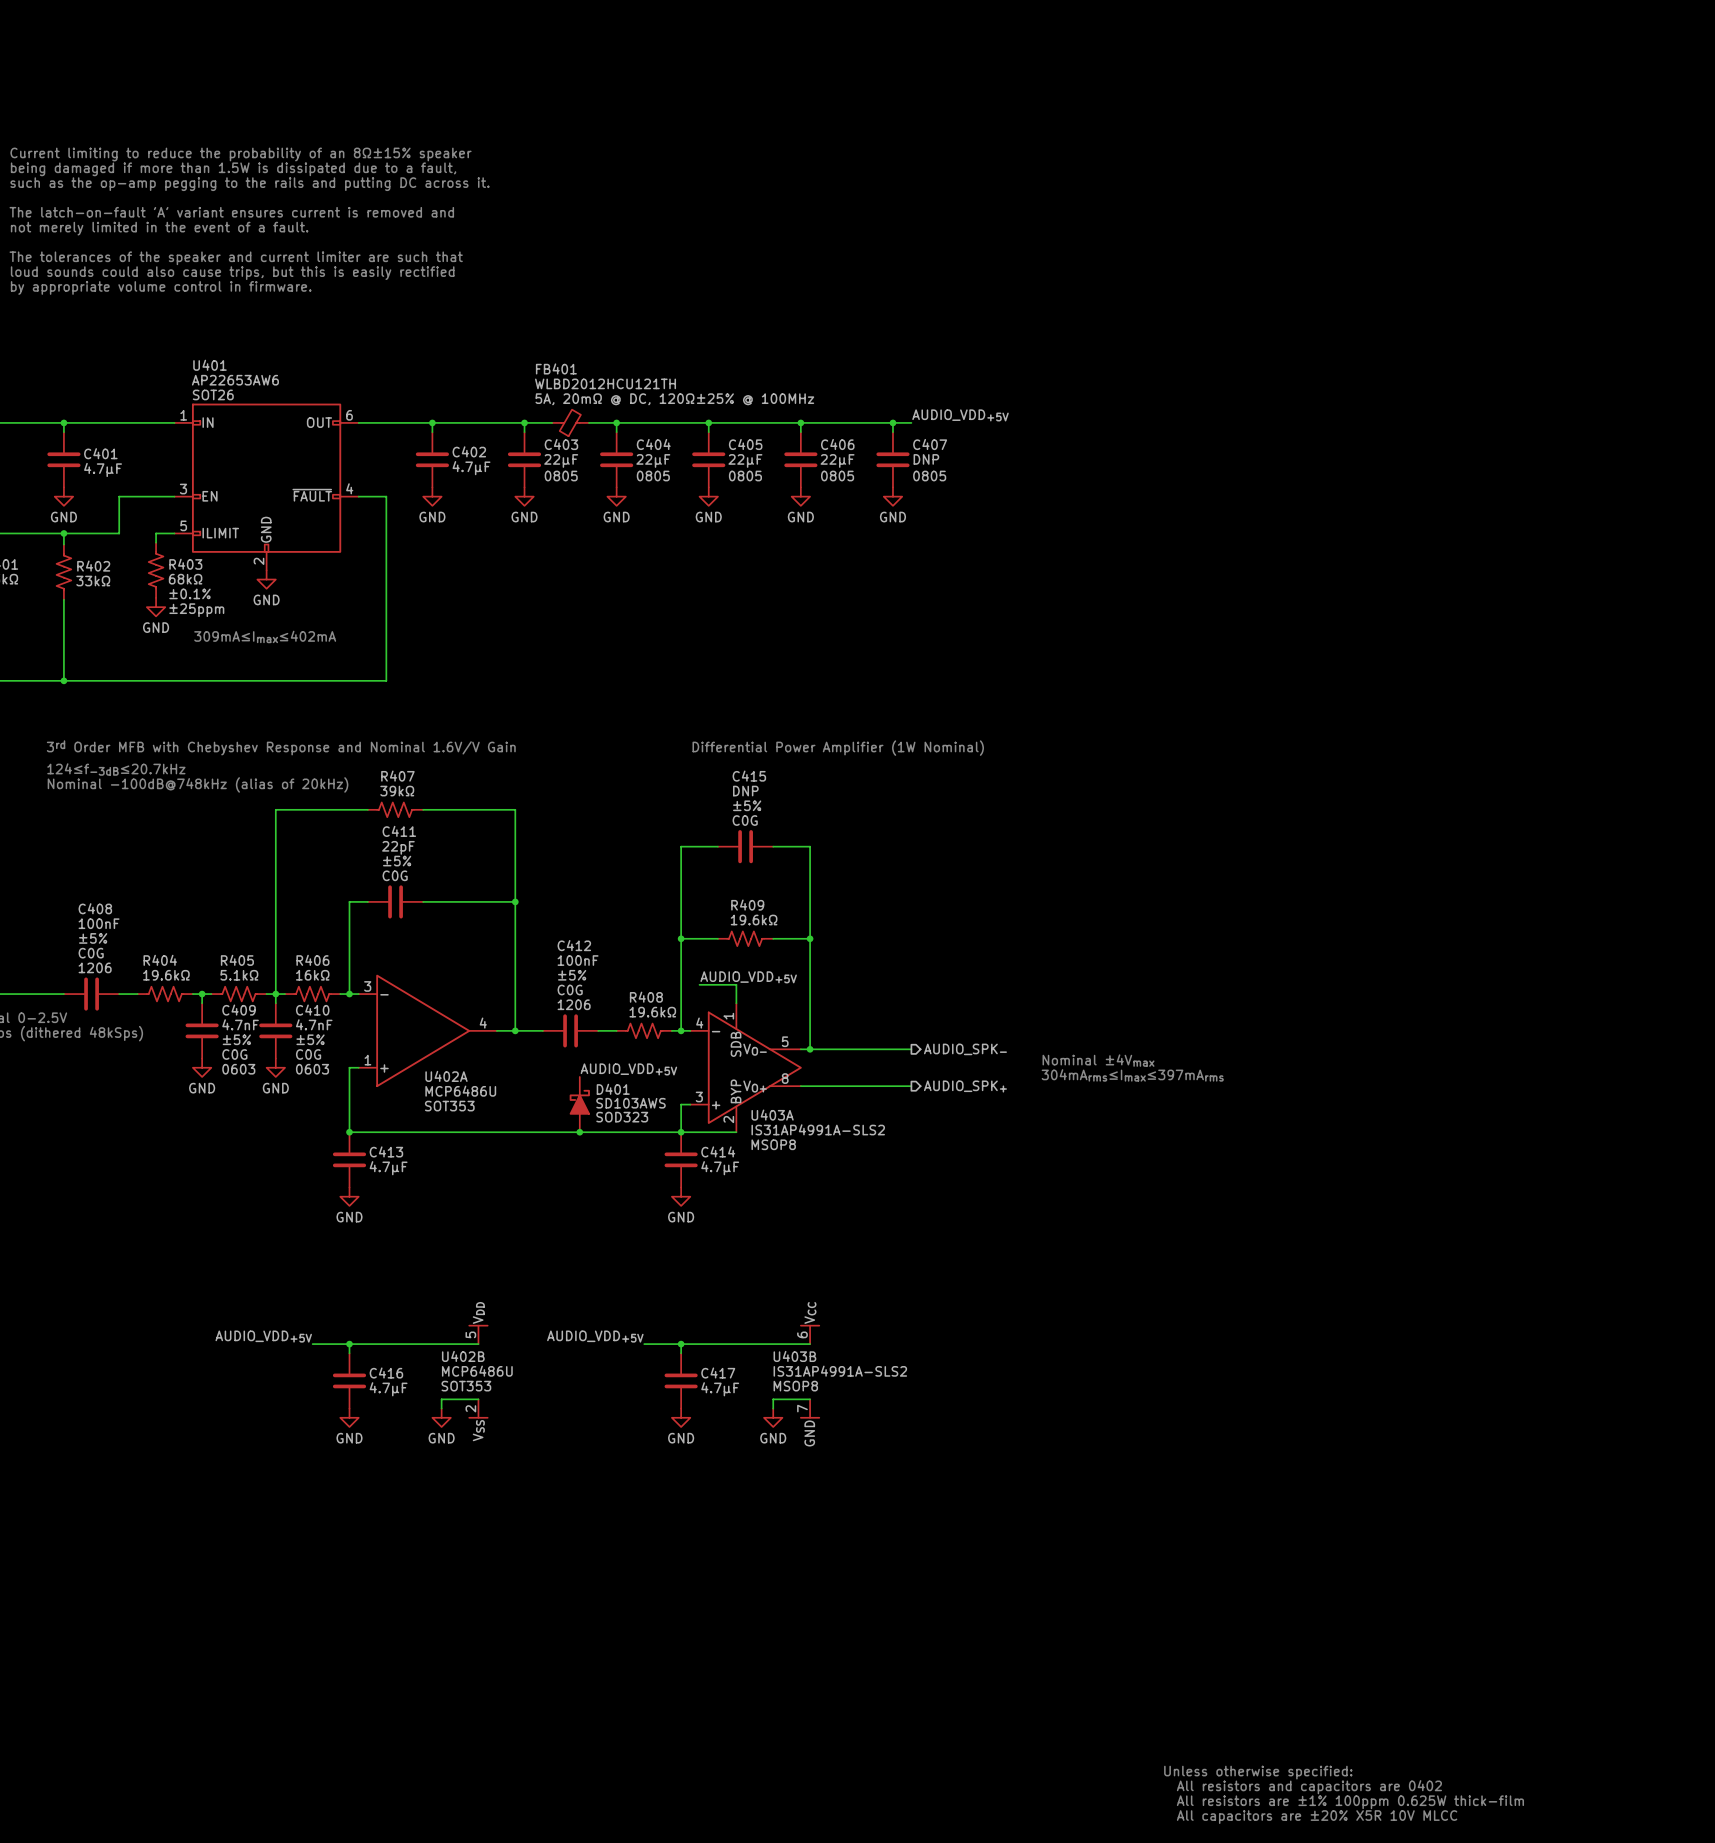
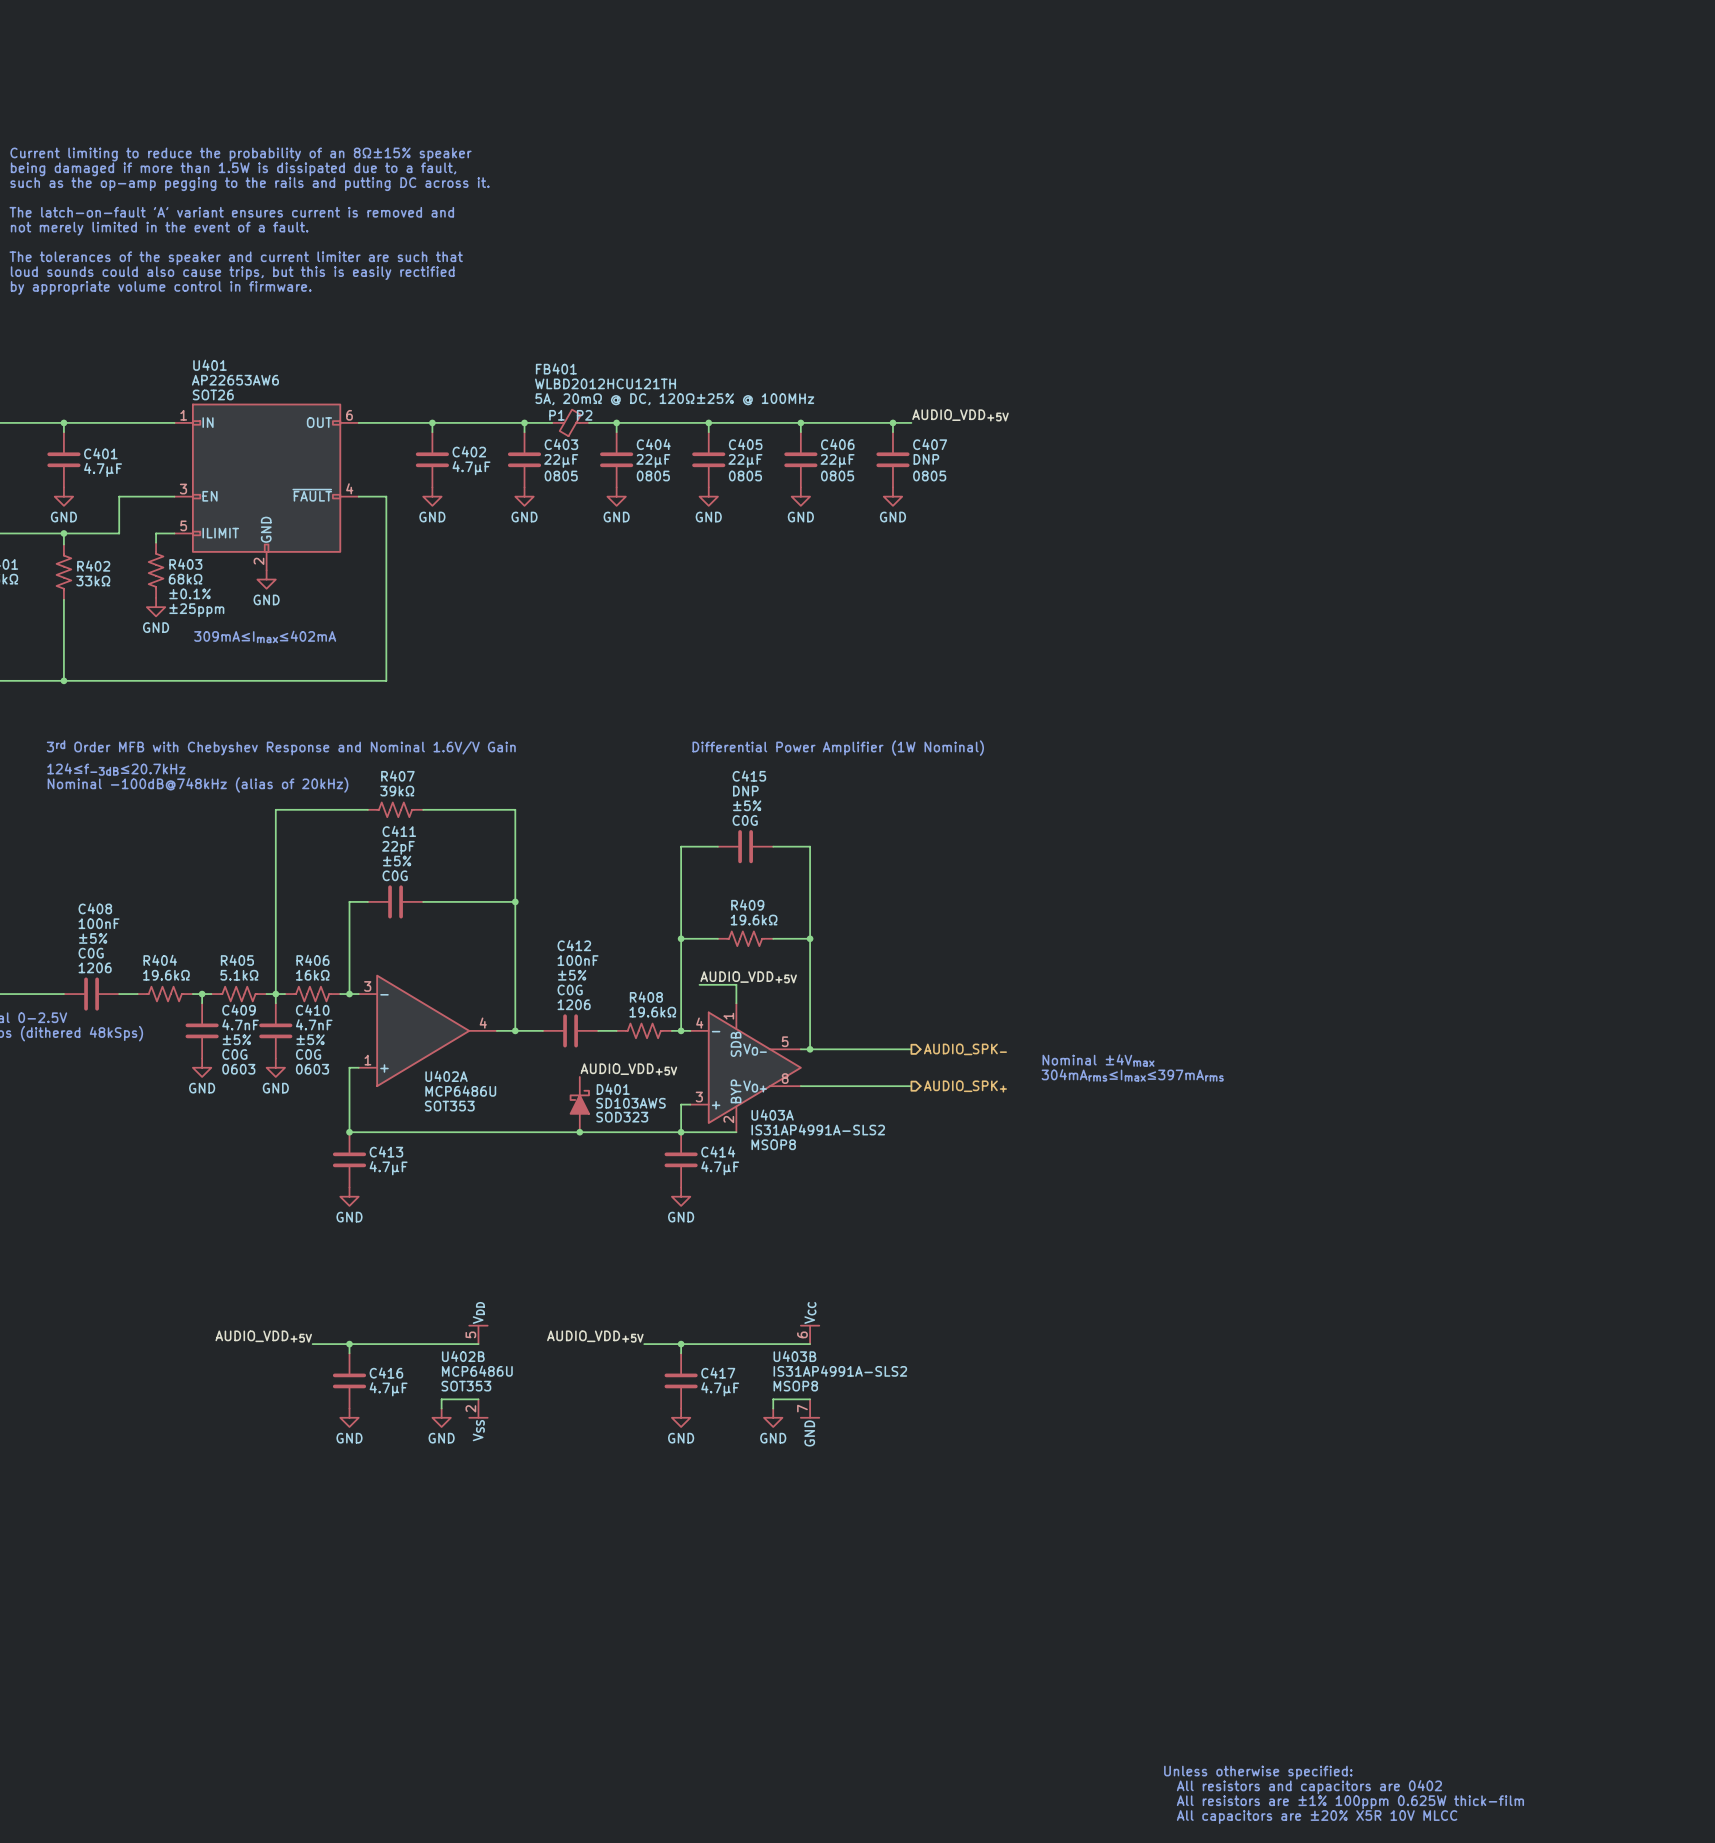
FB401 pin name: none -> P1 (556, 415)
FB401 pin name: none -> P2 (584, 415)

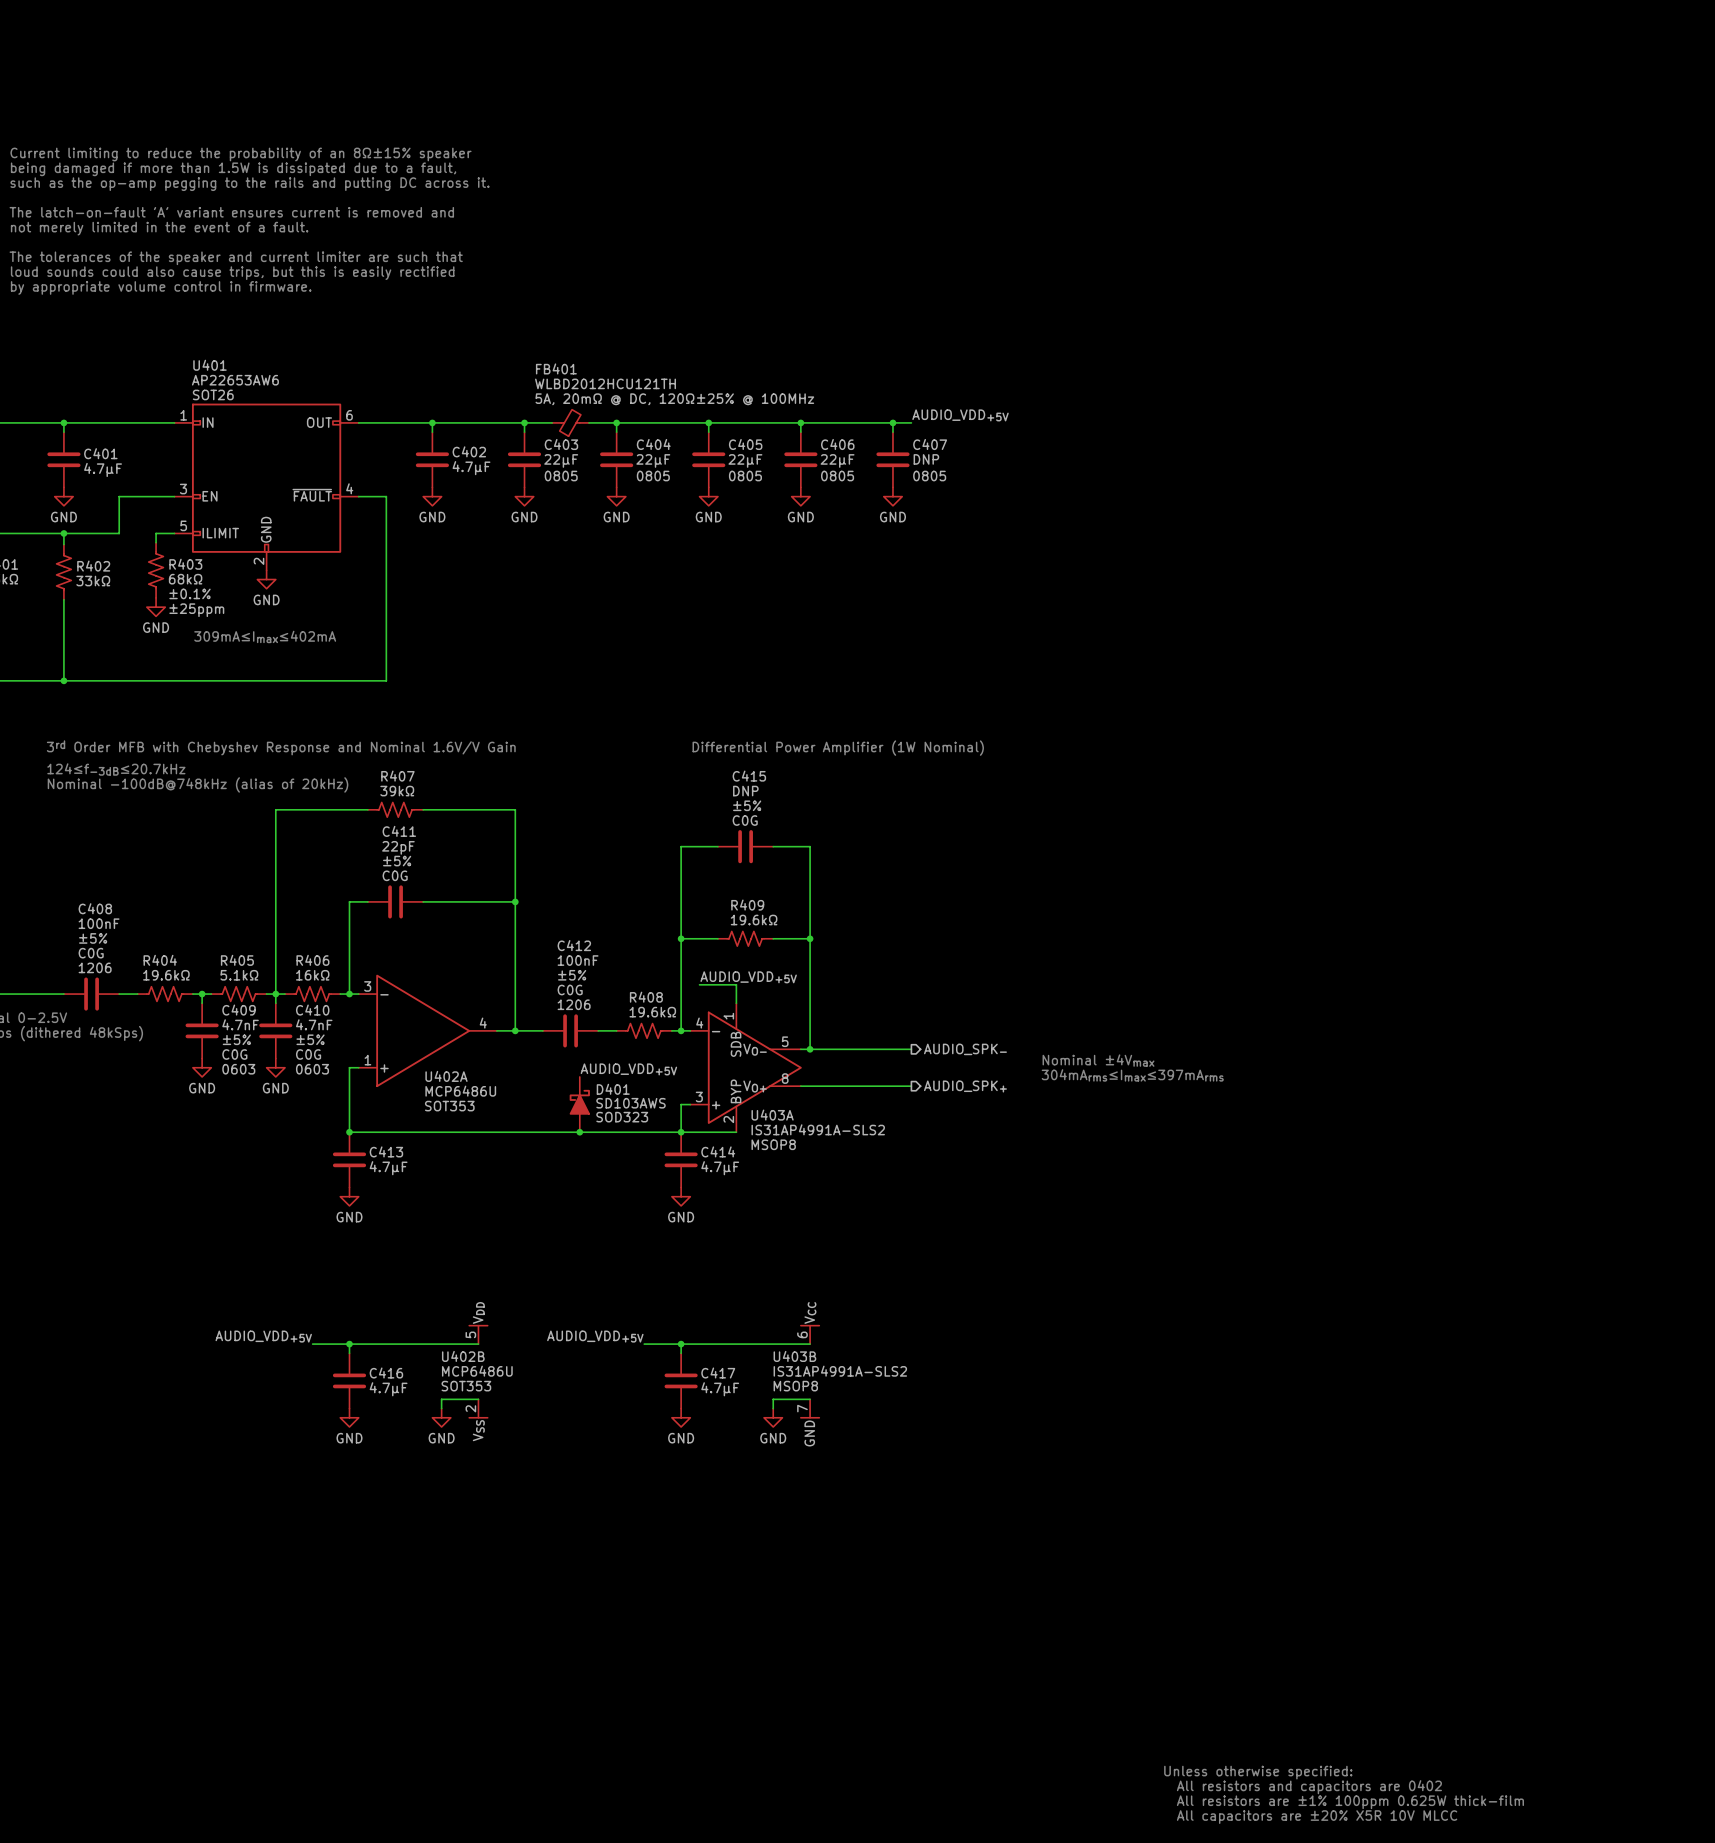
FB401 pin name: P1 (556, 415) -> none
FB401 pin name: P2 (584, 415) -> none

